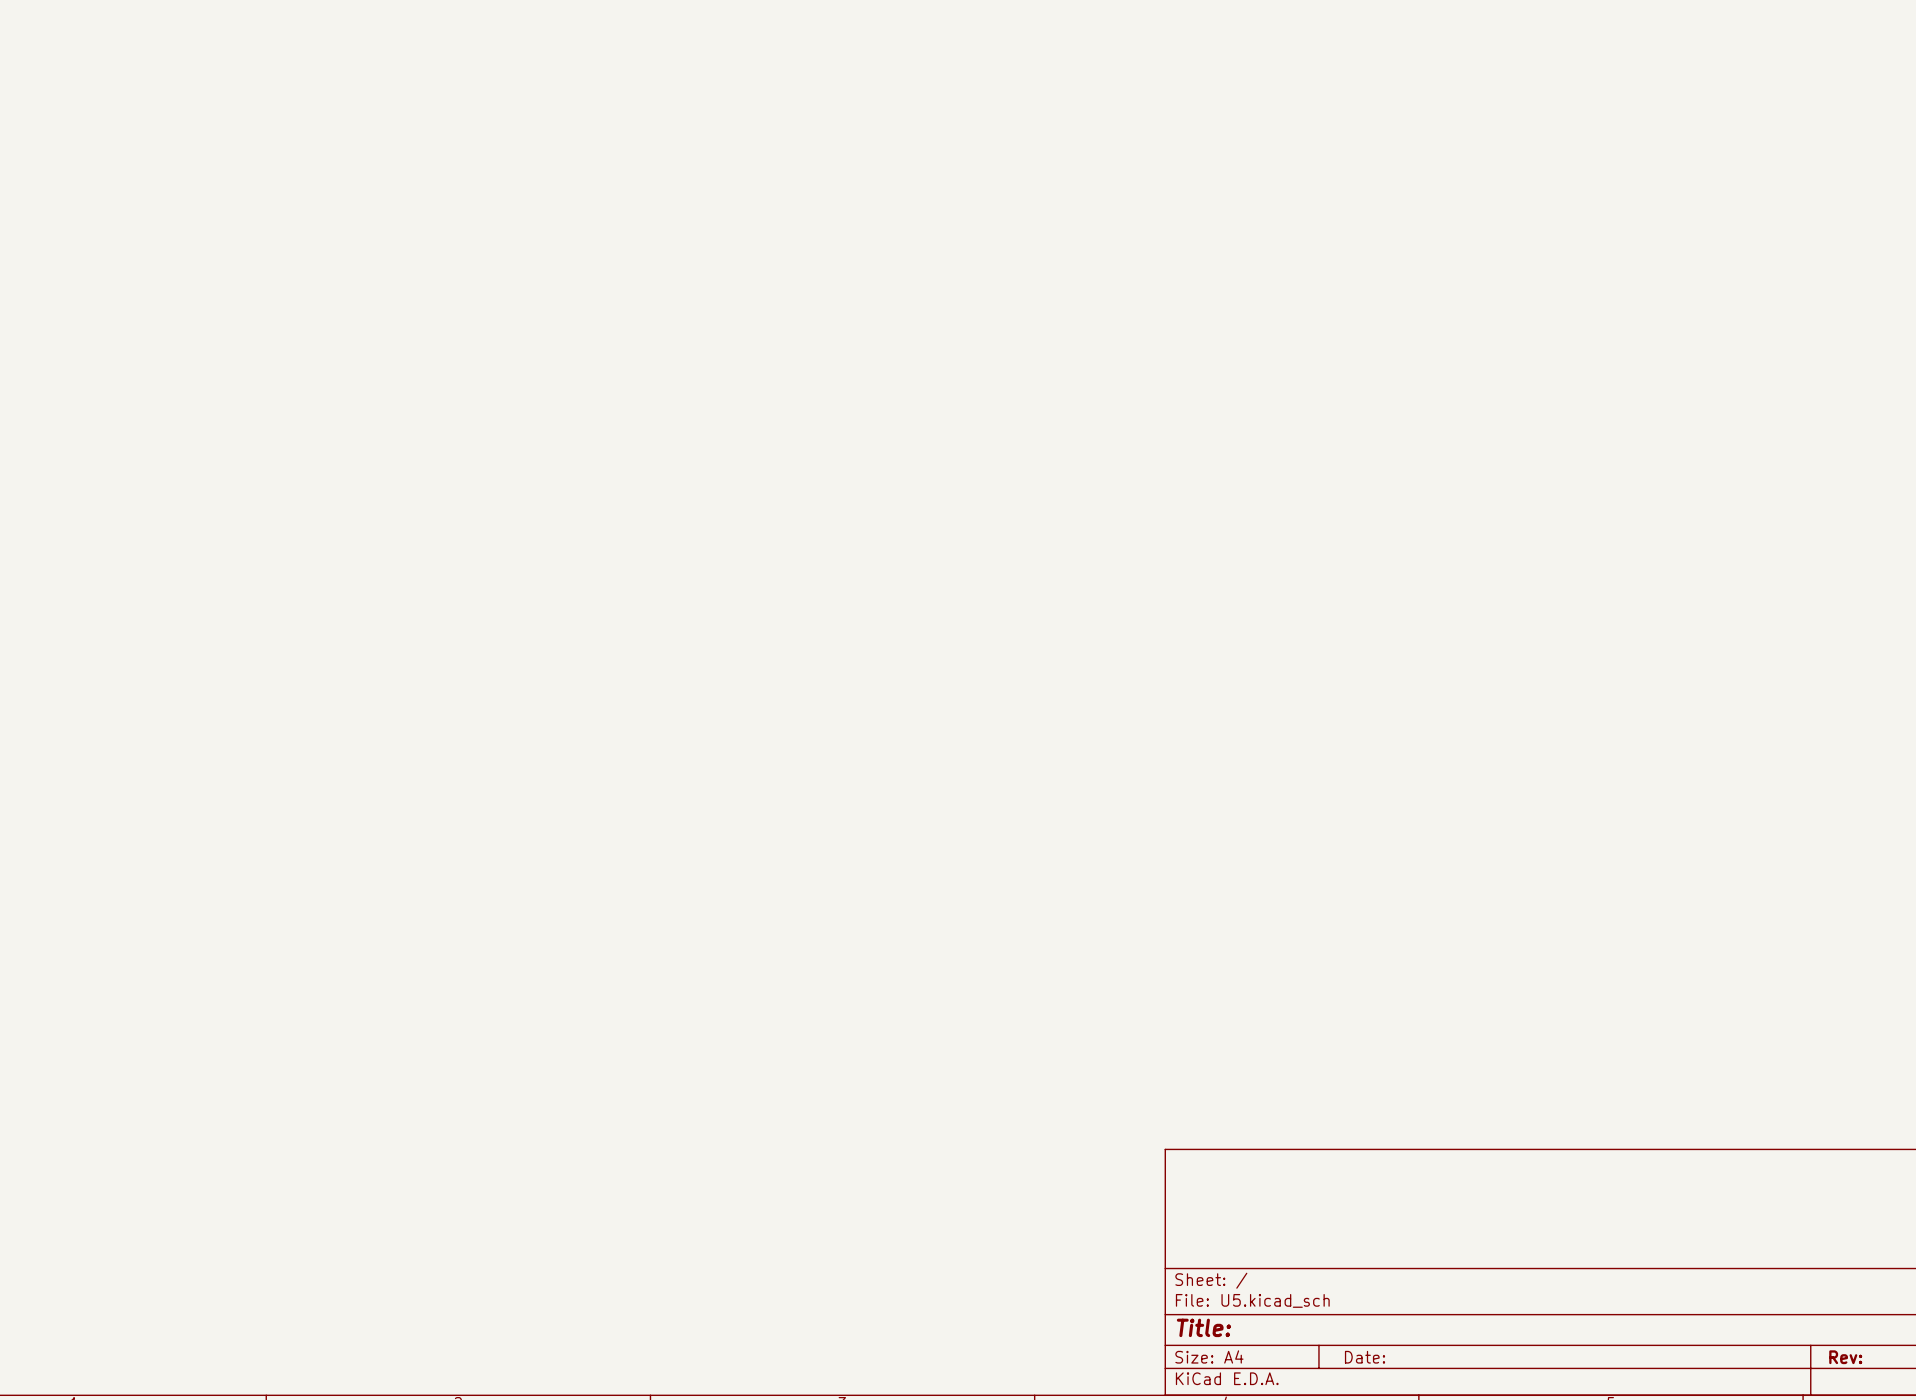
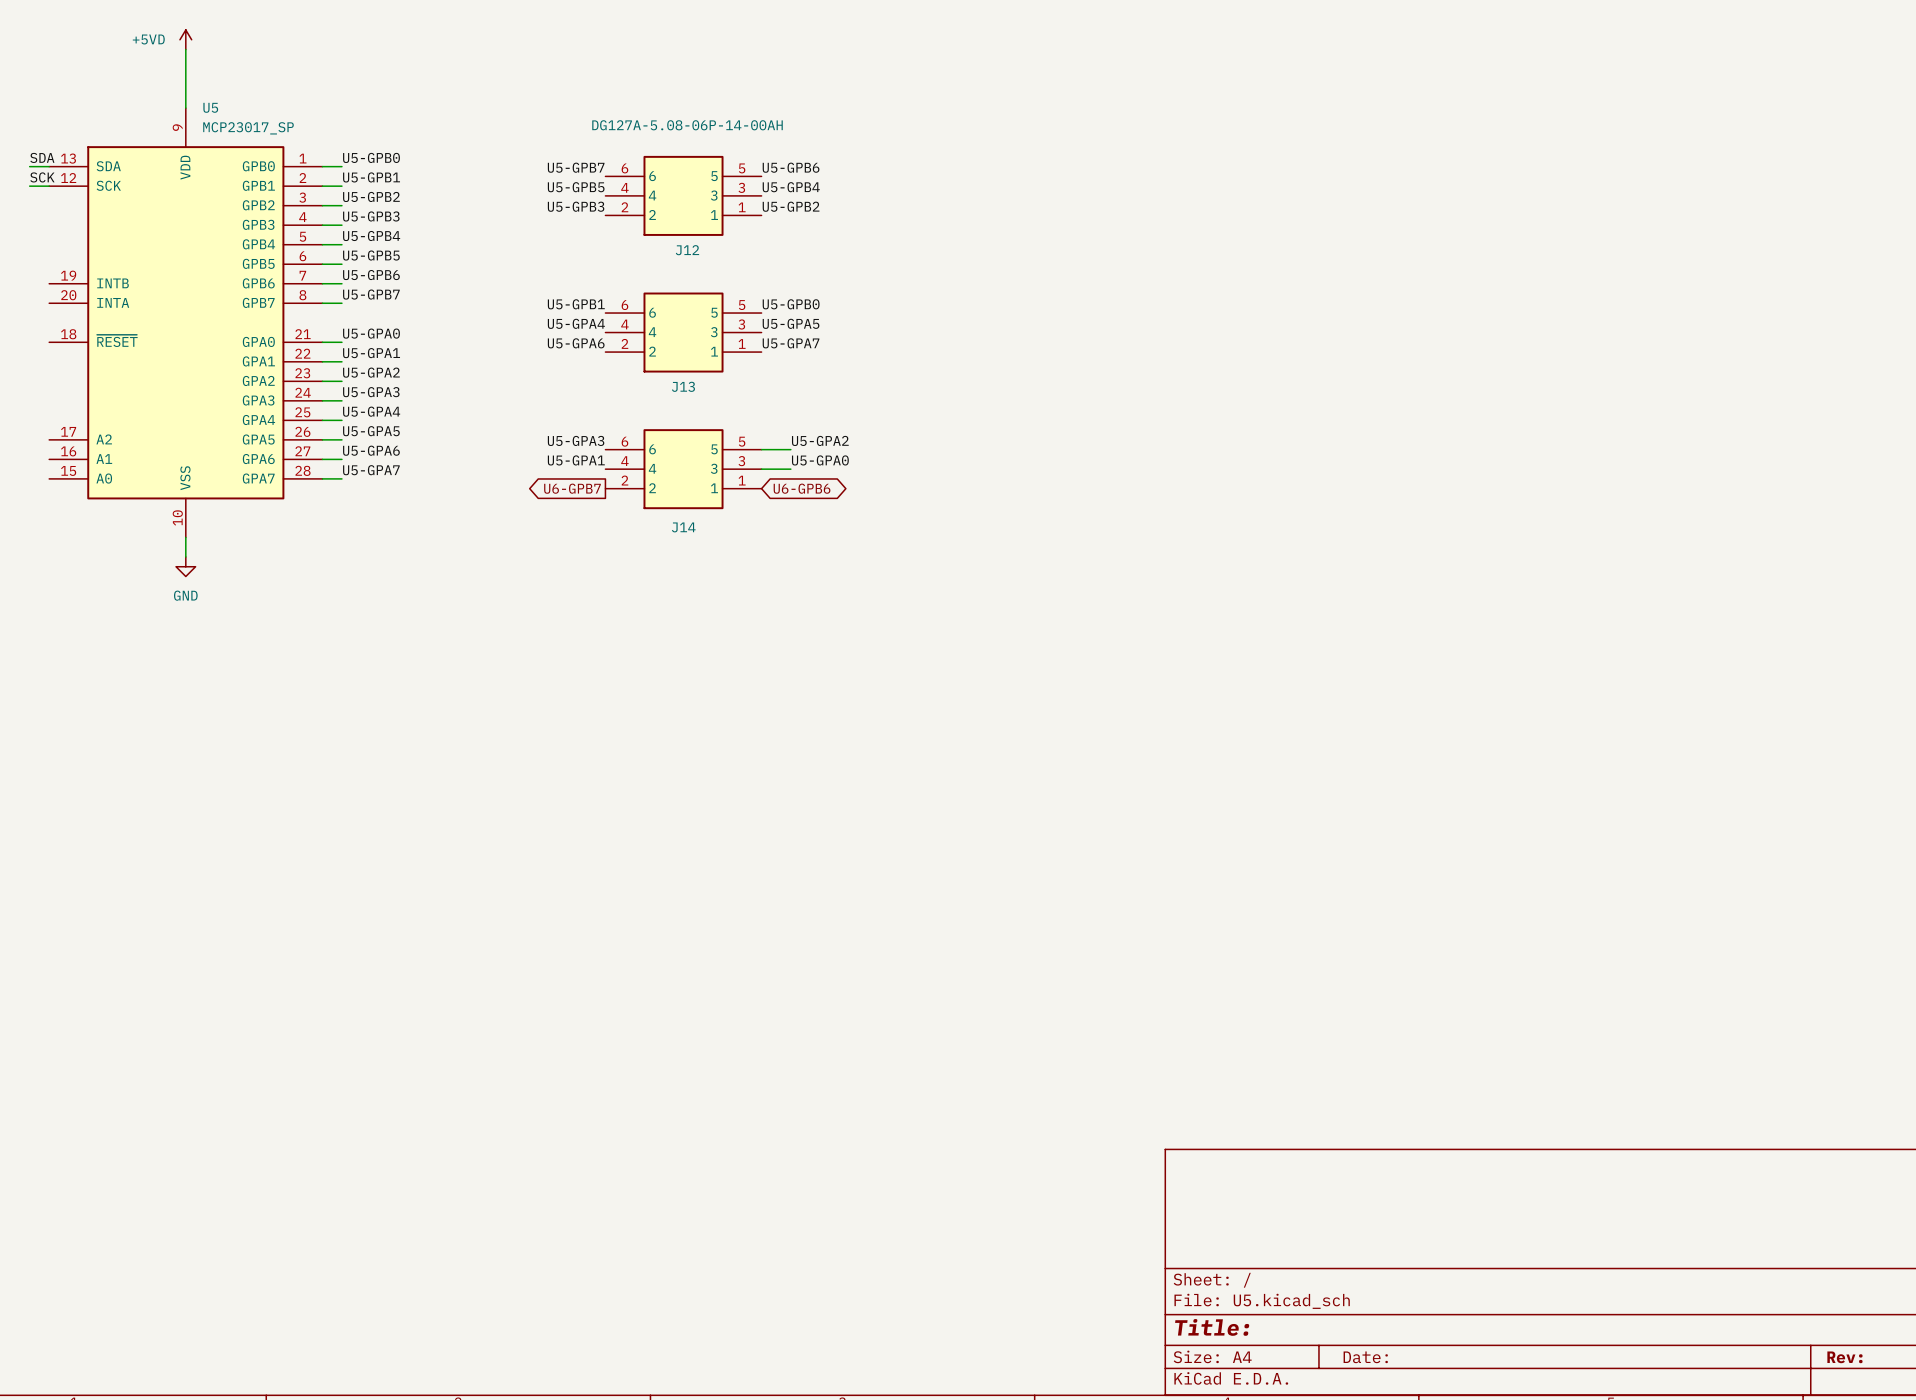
power symbol: none -> +5VD (185, 39)
wire: none -> (185, 49) (185, 108)
label: none -> SDA (42, 157)
label: none -> U5-GPB0 (371, 157)
wire: none -> (29, 166) (49, 166)
wire: none -> (322, 166) (341, 166)
label: none -> U5-GPB7 (576, 167)
label: none -> U5-GPB6 (791, 167)
label: none -> SCK (42, 177)
label: none -> U5-GPB1 (371, 177)
wire: none -> (29, 186) (49, 186)
wire: none -> (322, 186) (341, 186)
label: none -> U5-GPB4 (791, 187)
label: none -> U5-GPB5 (576, 187)
J12: none -> DG127A-5.08-06P-14-00AH (683, 195)
label: none -> U5-GPB2 (371, 196)
wire: none -> (322, 205) (341, 205)
label: none -> U5-GPB3 (576, 206)
label: none -> U5-GPB2 (791, 206)
label: none -> U5-GPB3 (371, 216)
wire: none -> (322, 225) (341, 225)
label: none -> U5-GPB4 (371, 236)
wire: none -> (322, 244) (341, 244)
label: none -> U5-GPB5 (371, 255)
wire: none -> (322, 264) (341, 264)
label: none -> U5-GPB6 (371, 275)
wire: none -> (322, 283) (341, 283)
label: none -> U5-GPB7 (371, 294)
wire: none -> (322, 303) (341, 303)
label: none -> U5-GPB1 (576, 304)
label: none -> U5-GPB0 (791, 304)
U5: none -> MCP23017_SP (185, 322)
label: none -> U5-GPA4 (576, 323)
label: none -> U5-GPA5 (791, 323)
J13: none -> (683, 332)
label: none -> U5-GPA0 (371, 333)
wire: none -> (322, 342) (341, 342)
label: none -> U5-GPA6 (576, 343)
label: none -> U5-GPA7 (791, 343)
label: none -> U5-GPA1 (371, 353)
wire: none -> (322, 361) (341, 361)
label: none -> U5-GPA2 (371, 372)
wire: none -> (322, 381) (341, 381)
label: none -> U5-GPA3 (371, 392)
wire: none -> (322, 400) (341, 400)
label: none -> U5-GPA4 (371, 411)
wire: none -> (322, 420) (341, 420)
label: none -> U5-GPA5 (371, 431)
wire: none -> (322, 439) (341, 439)
label: none -> U5-GPA3 (576, 440)
label: none -> U5-GPA2 (820, 440)
wire: none -> (761, 449) (790, 449)
label: none -> U5-GPA6 (371, 450)
wire: none -> (322, 459) (341, 459)
label: none -> U5-GPA1 (576, 460)
label: none -> U5-GPA0 (820, 460)
J14: none -> (683, 469)
wire: none -> (761, 469) (790, 469)
label: none -> U5-GPA7 (371, 470)
wire: none -> (322, 478) (341, 478)
global label: none -> U6-GPB7 (572, 488)
global label: none -> U6-GPB6 (802, 488)
wire: none -> (185, 537) (185, 556)
power symbol: none -> GND (185, 566)

